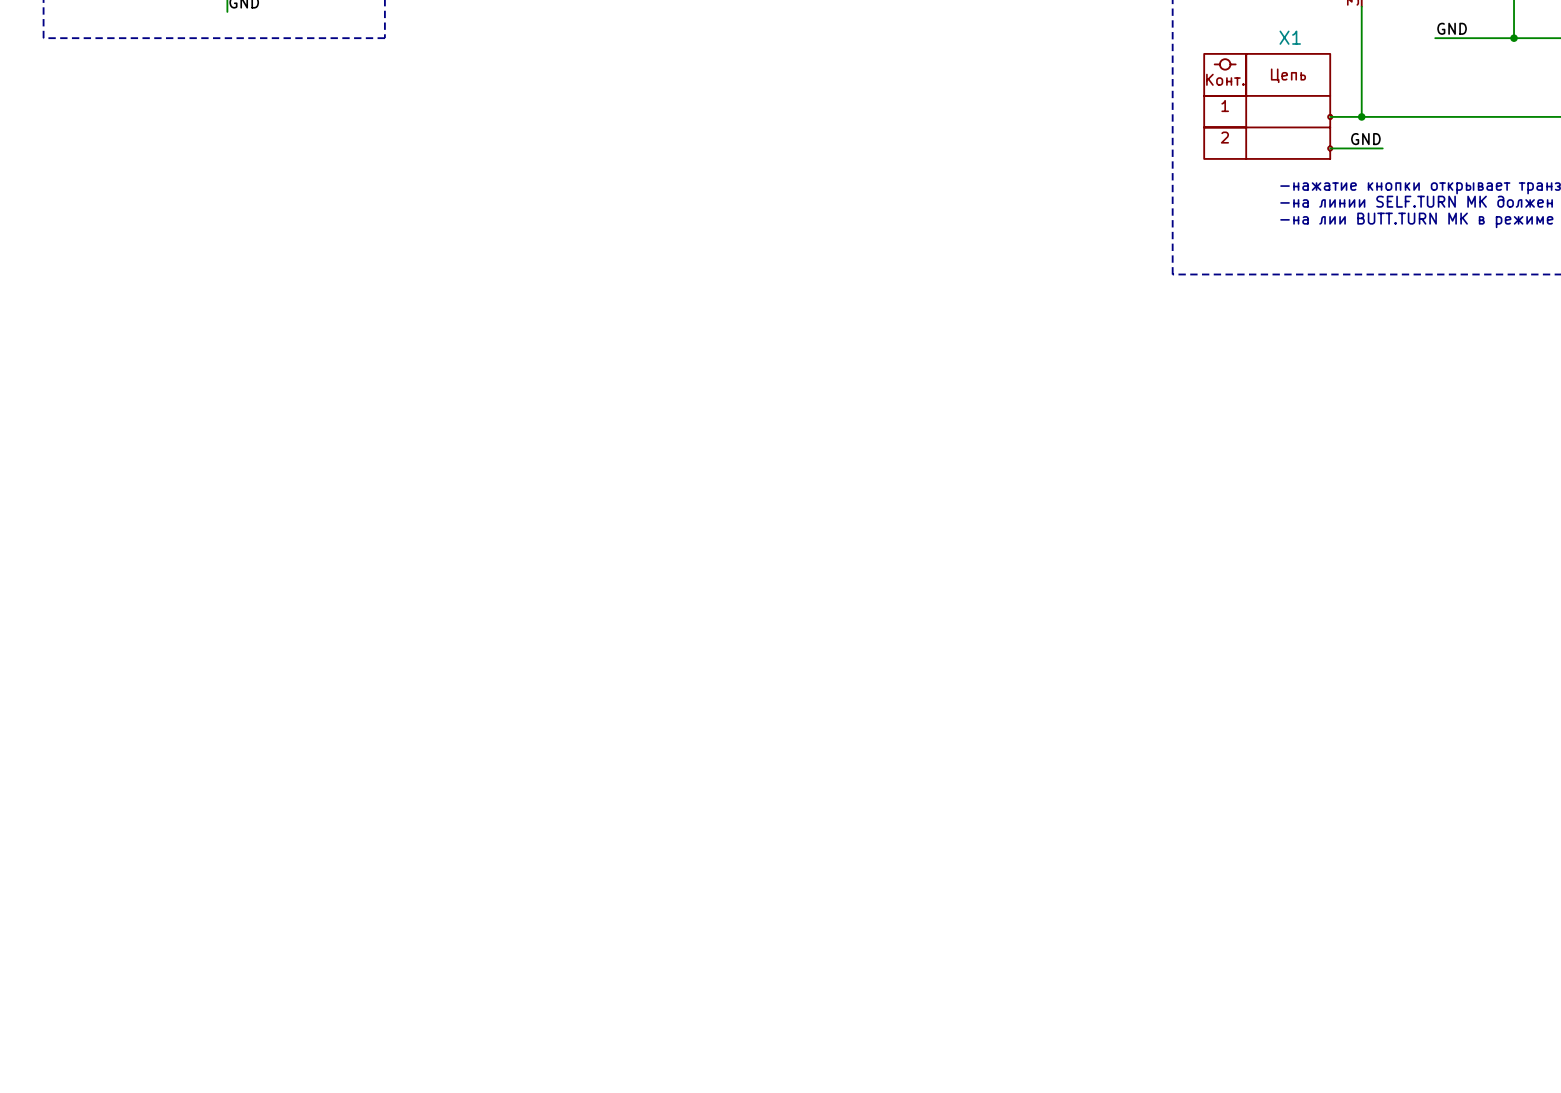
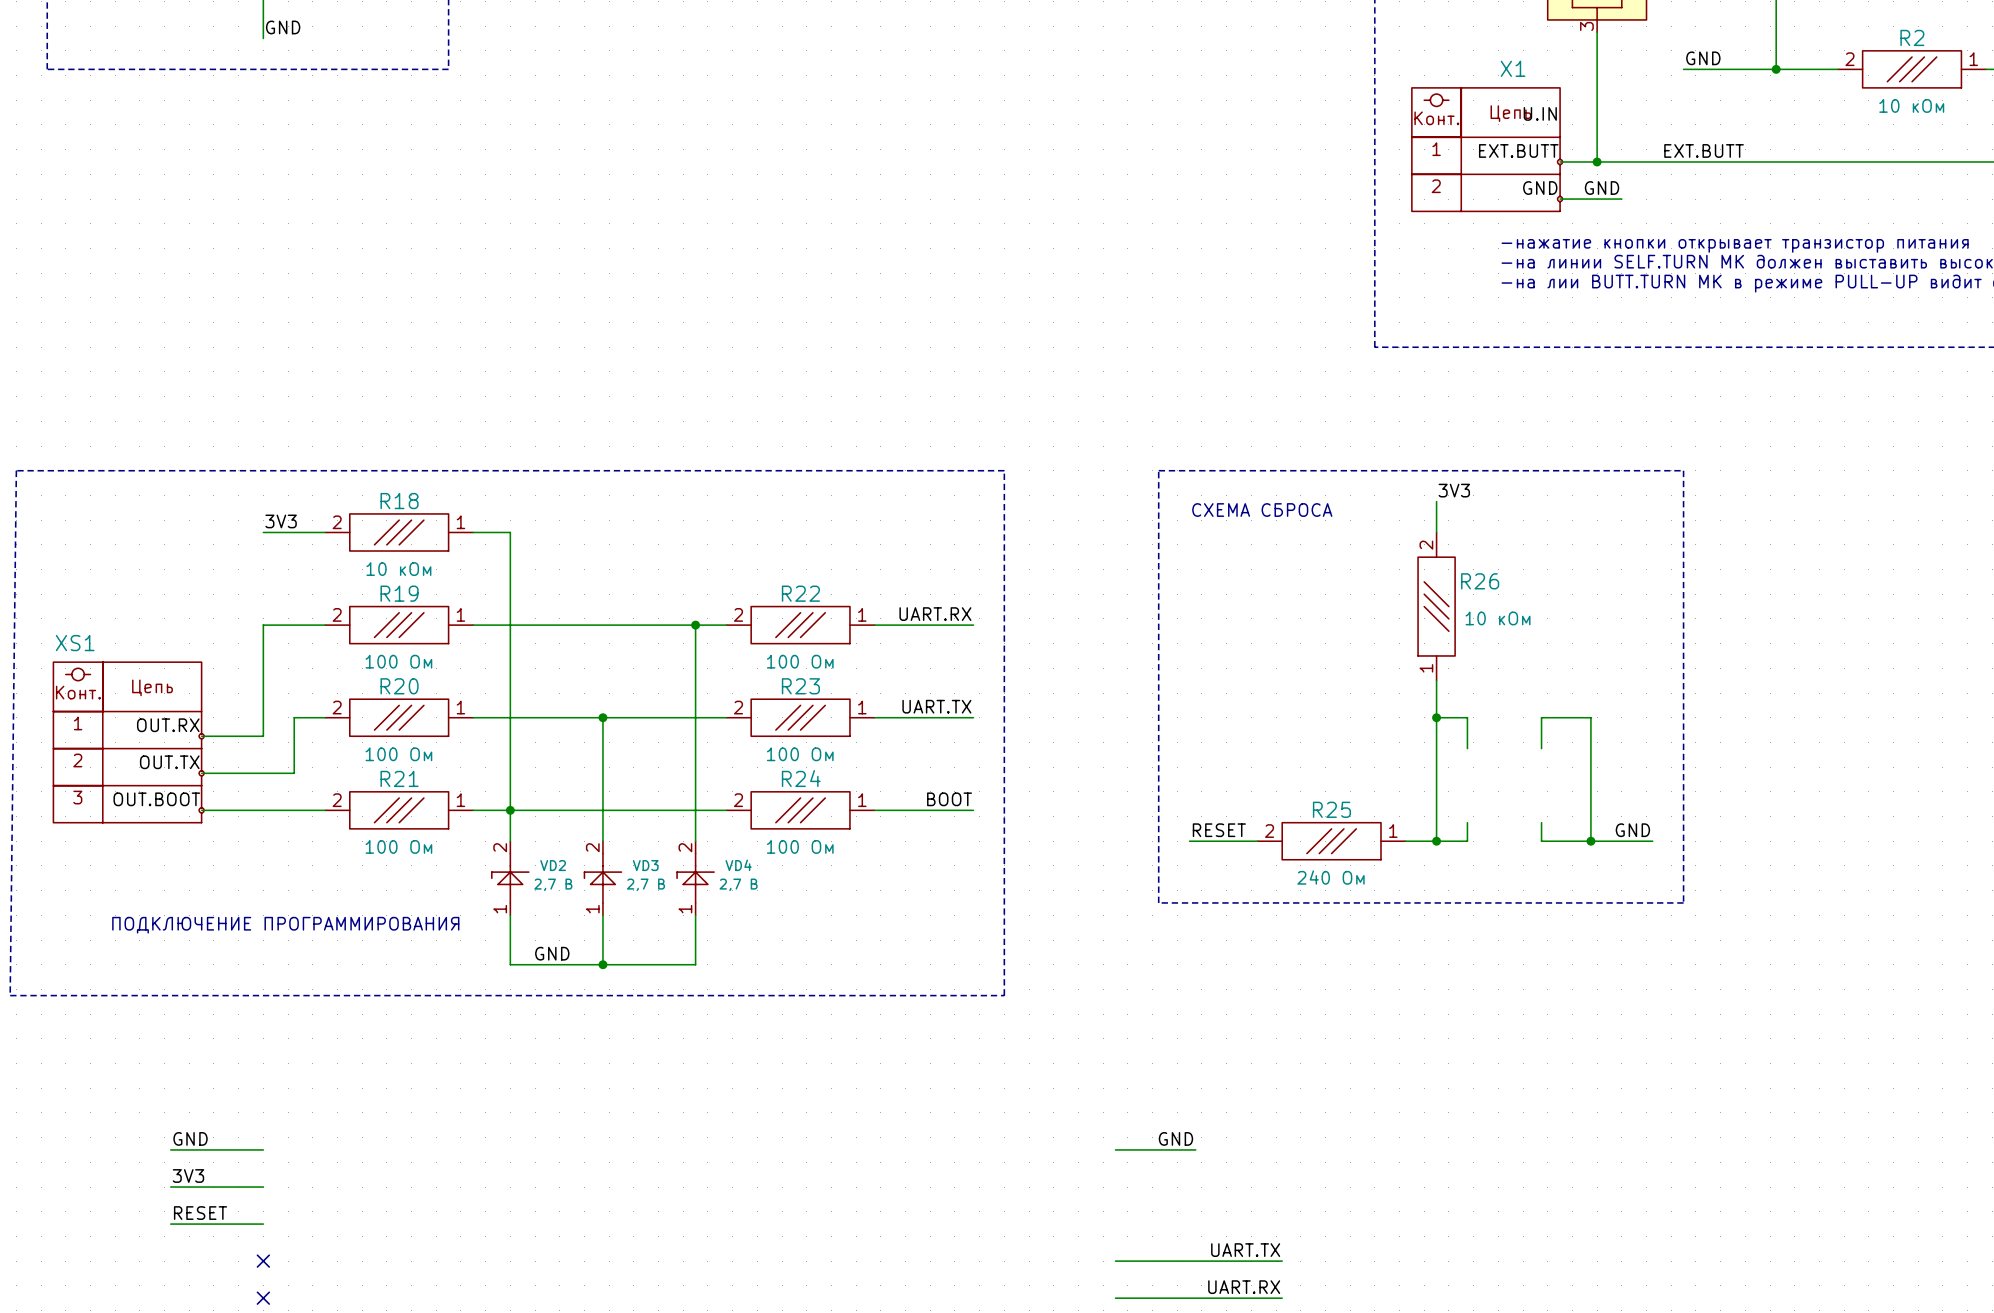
label: none -> U.IN (1540, 113)
label: none -> EXT.BUTT (1518, 150)
label: none -> EXT.BUTT (1704, 150)
label: none -> GND (1540, 188)
line: none -> (16, 470) (1004, 470) (1004, 995) (10, 995) (16, 470)
line: none -> (1158, 470) (1683, 470) (1683, 902) (1158, 902) (1158, 470)
label: none -> 3V3 (1454, 490)
wire: none -> (1436, 501) (1436, 532)
text: none -> СХЕМА СБРОСА (1262, 510)
label: none -> 3V3 (281, 521)
wire: none -> (263, 532) (325, 532)
R18: none -> (399, 532)
wire: none -> (473, 532) (510, 532) (510, 841)
R26: none -> (1436, 606)
label: none -> UART.RX (935, 614)
wire: none -> (325, 625) (263, 625) (263, 736) (201, 736)
R19: none -> (399, 625)
wire: none -> (473, 625) (726, 625)
wire: none -> (695, 625) (695, 841)
junction: none -> (695, 625)
R22: none -> (800, 625)
wire: none -> (874, 625) (973, 625)
wire: none -> (1436, 680) (1436, 841)
label: none -> UART.TX (936, 706)
wire: none -> (325, 717) (294, 717) (294, 773) (201, 773)
R20: none -> (399, 717)
wire: none -> (473, 717) (726, 717)
wire: none -> (602, 717) (602, 841)
junction: none -> (602, 717)
R23: none -> (800, 717)
wire: none -> (874, 717) (973, 717)
wire: none -> (1436, 717) (1467, 717) (1467, 748)
junction: none -> (1436, 717)
label: none -> OUT.RX (168, 725)
XS1: none -> (128, 742)
wire: none -> (1541, 748) (1541, 717) (1590, 717) (1590, 841)
label: none -> OUT.TX (169, 762)
label: none -> OUT.BOOT (156, 799)
label: none -> BOOT (949, 799)
wire: none -> (201, 810) (325, 810)
R21: none -> (399, 810)
wire: none -> (473, 810) (726, 810)
junction: none -> (510, 810)
R24: none -> (800, 810)
wire: none -> (874, 810) (973, 810)
wire: none -> (1467, 822) (1467, 841) (1405, 841)
wire: none -> (1541, 822) (1541, 841) (1652, 841)
label: none -> RESET (1219, 830)
label: none -> GND (1632, 830)
wire: none -> (1189, 841) (1257, 841)
R25: none -> (1331, 841)
junction: none -> (1436, 841)
junction: none -> (1590, 841)
VD2: none -> (510, 878)
VD3: none -> (602, 878)
VD4: none -> (695, 878)
wire: none -> (510, 915) (510, 964) (695, 964) (695, 915)
wire: none -> (602, 915) (602, 964)
text: none -> ПОДКЛЮЧЕНИЕ ПРОГРАММИРОВАНИЯ (285, 925)
label: none -> GND (552, 953)
junction: none -> (602, 964)
label: none -> GND (190, 1138)
label: none -> GND (1175, 1138)
wire: none -> (170, 1149) (263, 1149)
wire: none -> (1115, 1149) (1195, 1149)
label: none -> 3V3 (188, 1175)
wire: none -> (170, 1187) (263, 1187)
label: none -> RESET (200, 1213)
wire: none -> (170, 1224) (263, 1224)
label: none -> UART.TX (1245, 1250)
no-connect mark: none -> (263, 1261)
wire: none -> (1115, 1261) (1282, 1261)
label: none -> UART.RX (1244, 1287)
no-connect mark: none -> (263, 1298)
wire: none -> (1115, 1298) (1282, 1298)

